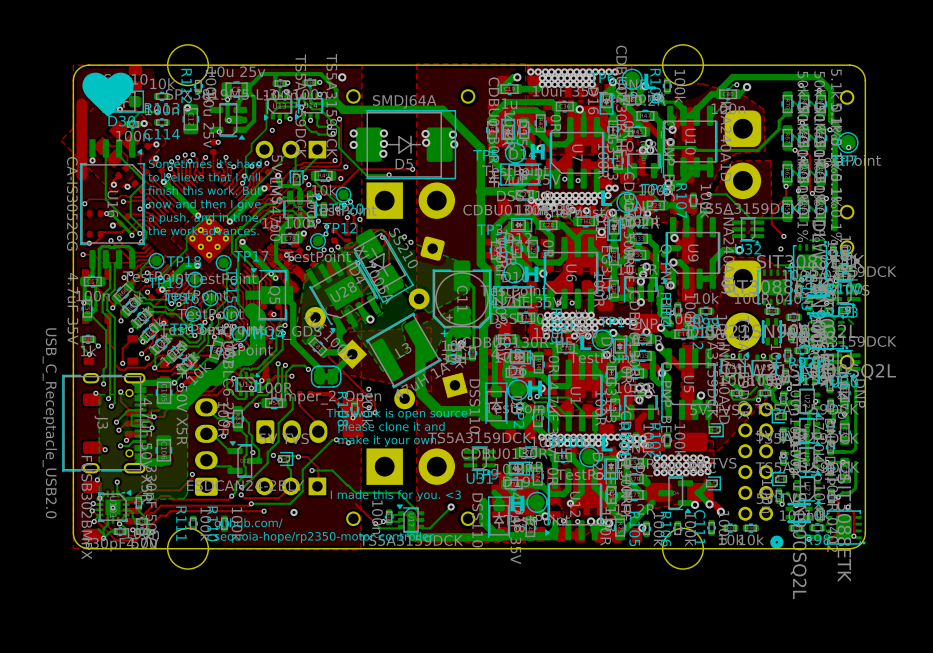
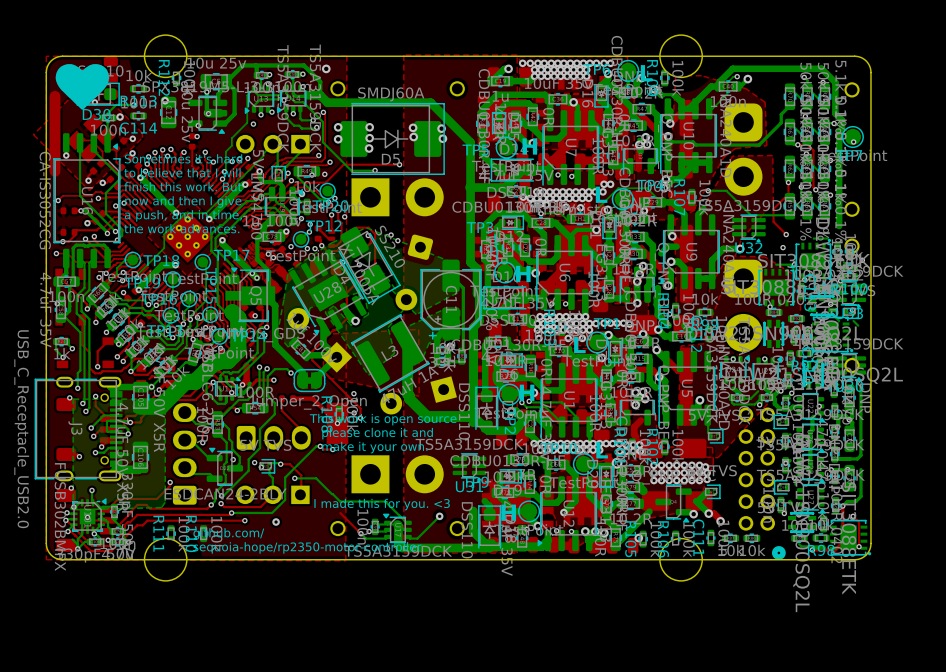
D5 value: SMDJ64A (404, 101) -> SMDJ60A (391, 94)

